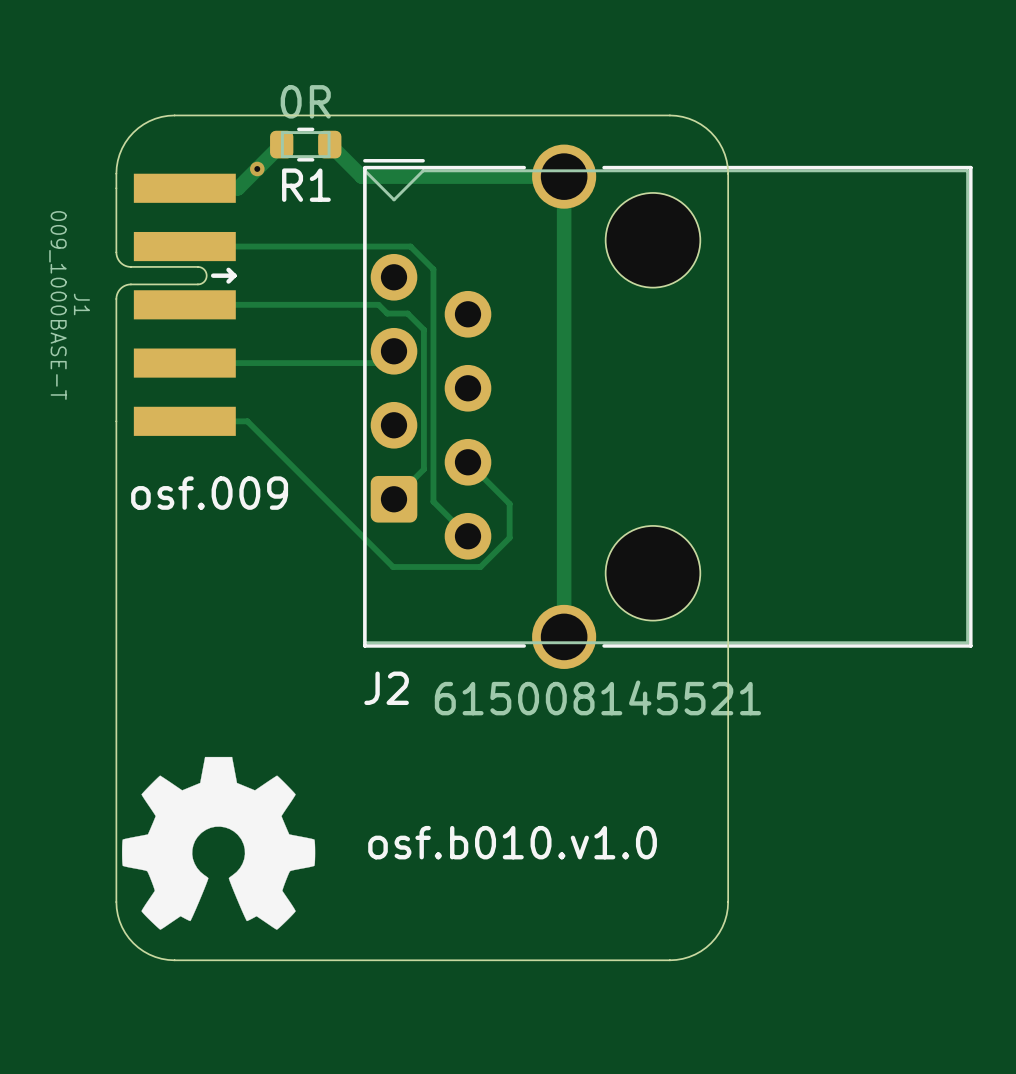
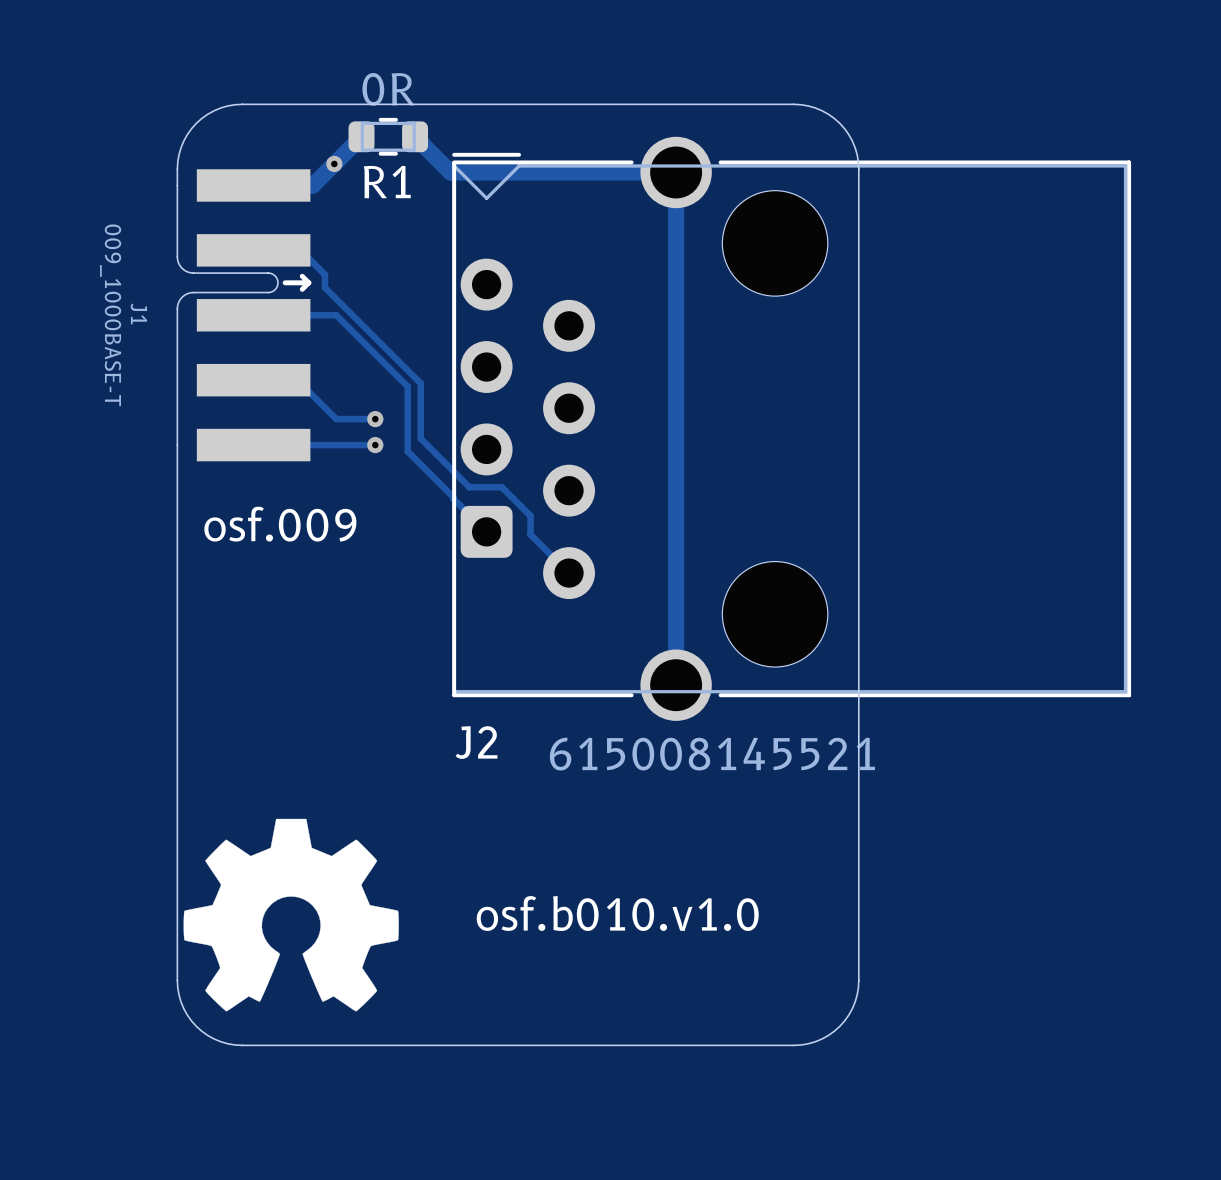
track: (227, 246) (410, 246) (433, 269) (433, 484) -> (300, 250) (325, 274) (325, 287) (420, 383) (420, 438) (469, 487) (501, 487) (530, 515)
track: (259, 304) (378, 304) (387, 313) (407, 313) (423, 329) (423, 469) (394, 499) -> (336, 315) (407, 386) (407, 451) (486, 531)
track: (394, 351) (382, 363) (224, 363) -> (375, 419) (336, 419) (297, 380)
via: none -> (375, 419)
track: (247, 421) (393, 567) (480, 567) (509, 537) (509, 503) (468, 462) -> (323, 445) (375, 445)
via: none -> (375, 445)

